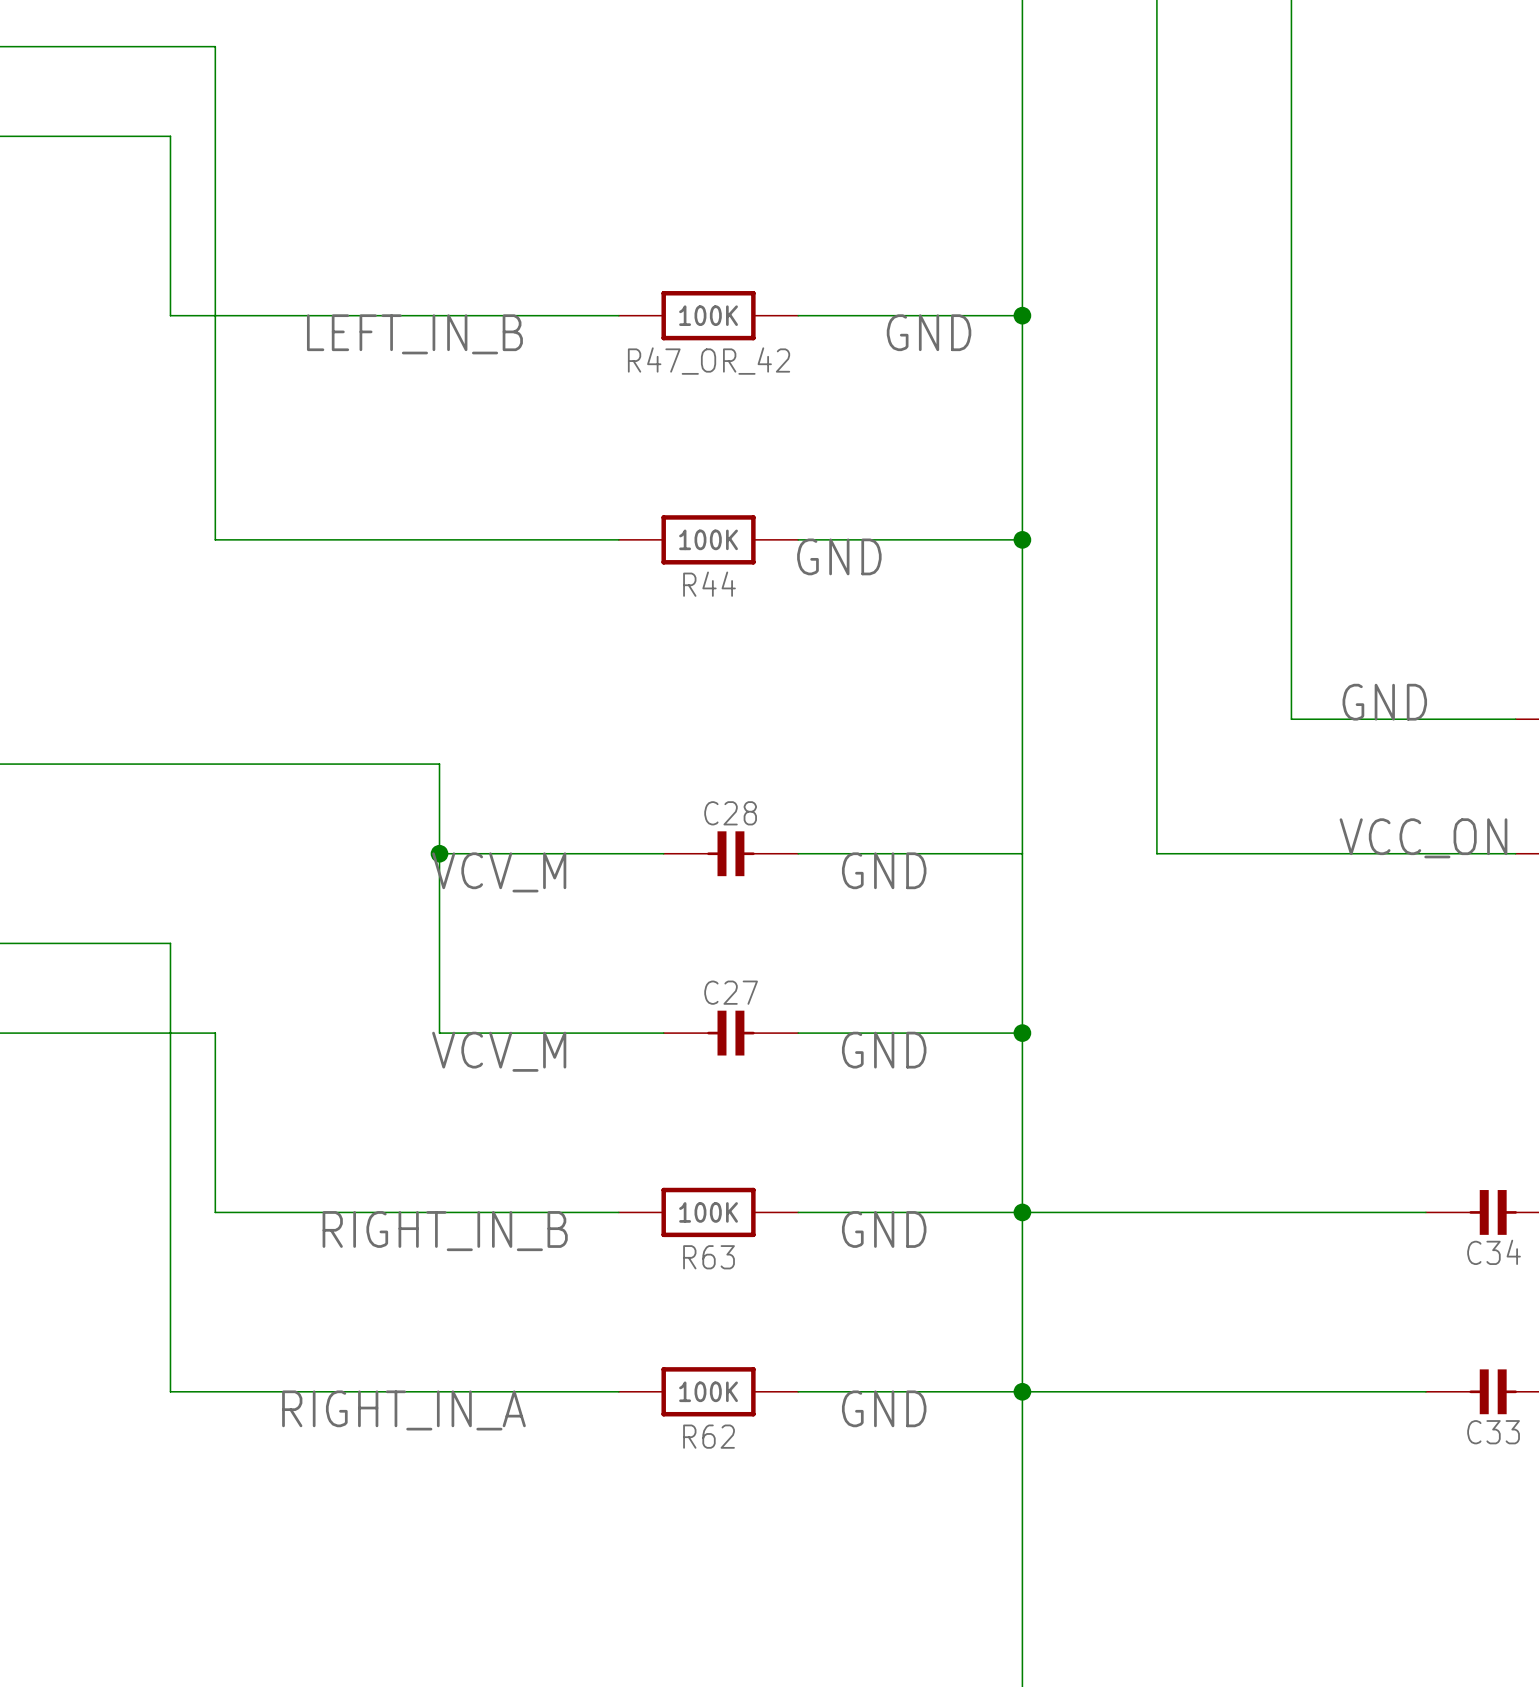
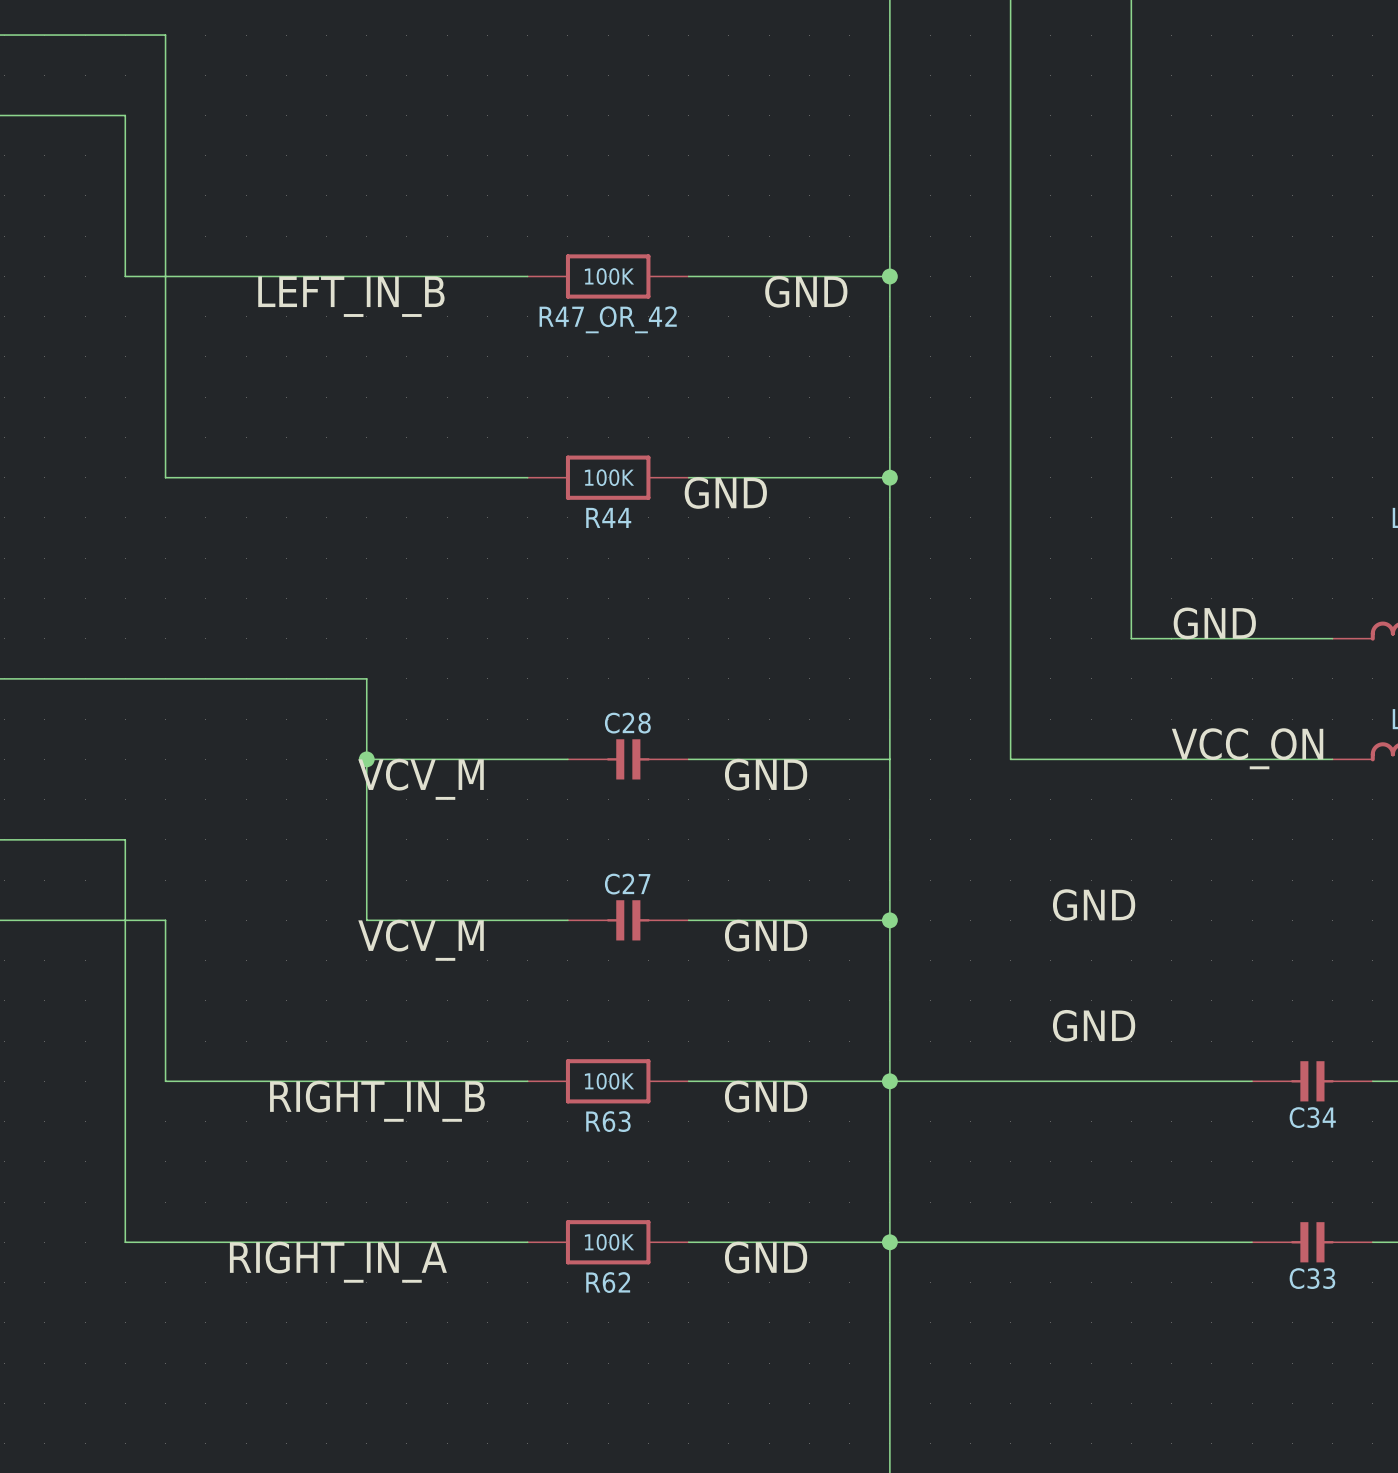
label: none -> GND (1094, 905)
label: none -> GND (1094, 1025)

